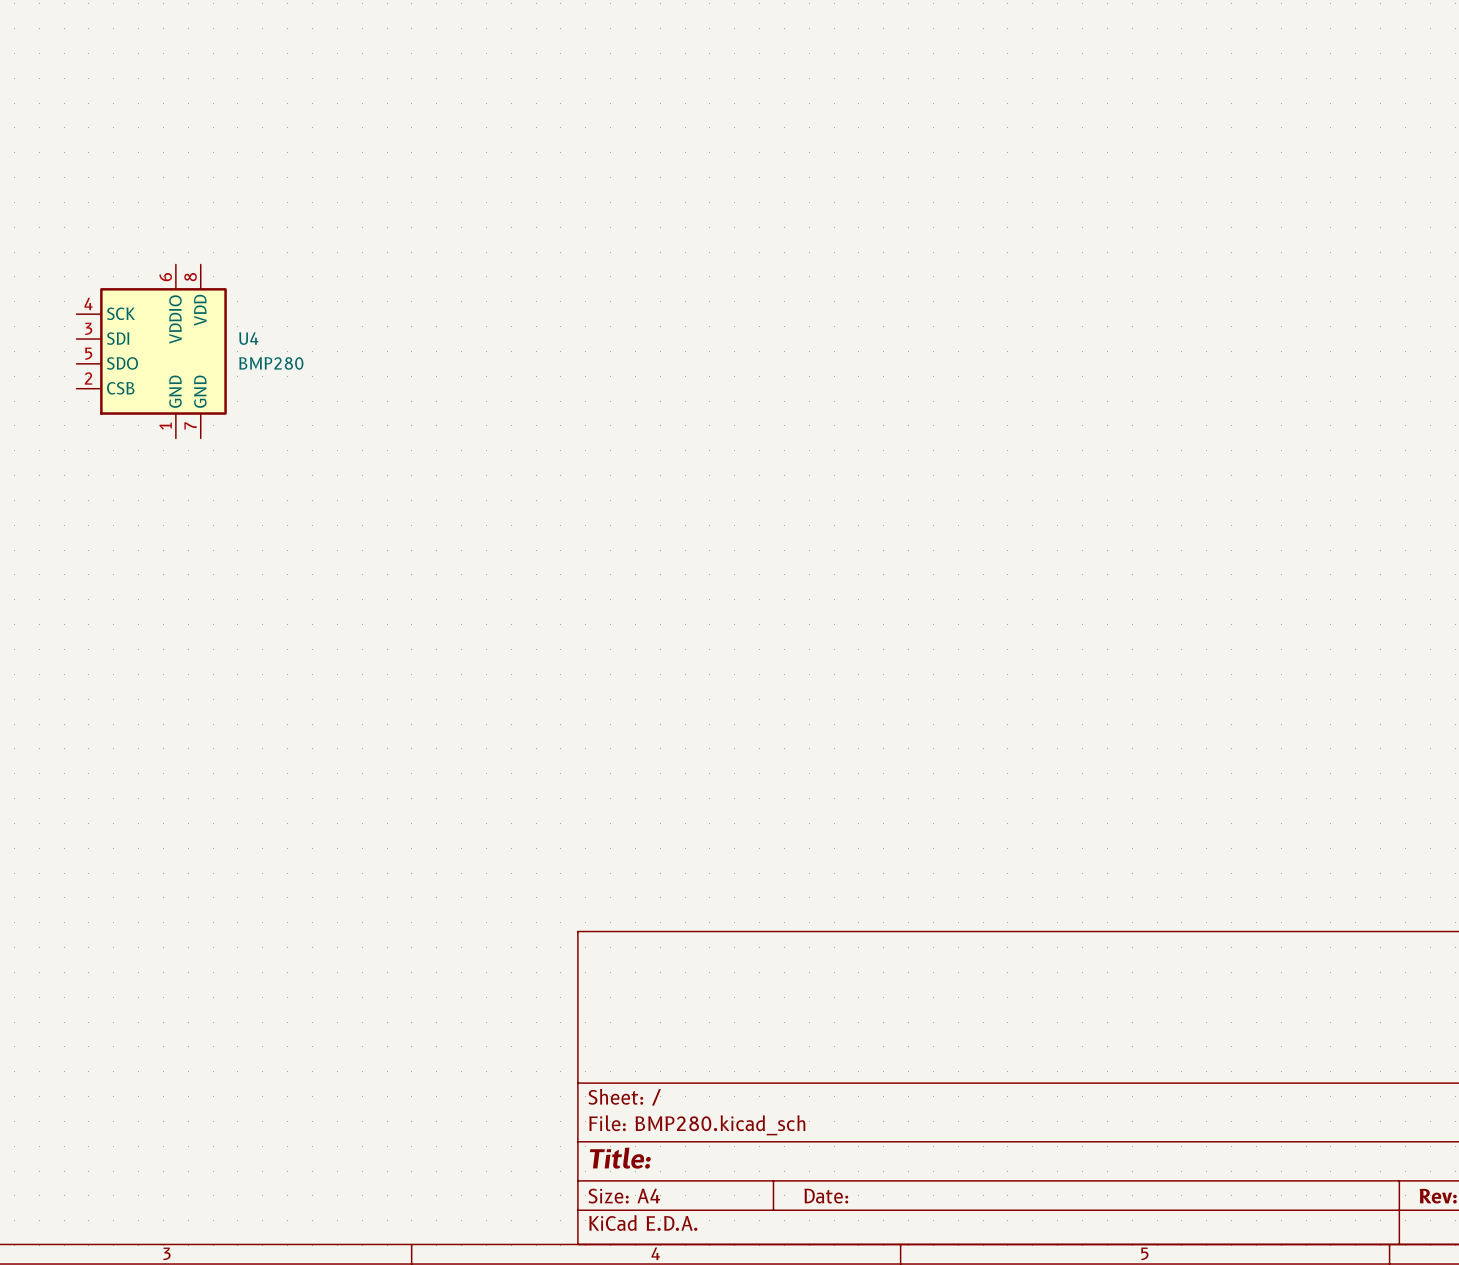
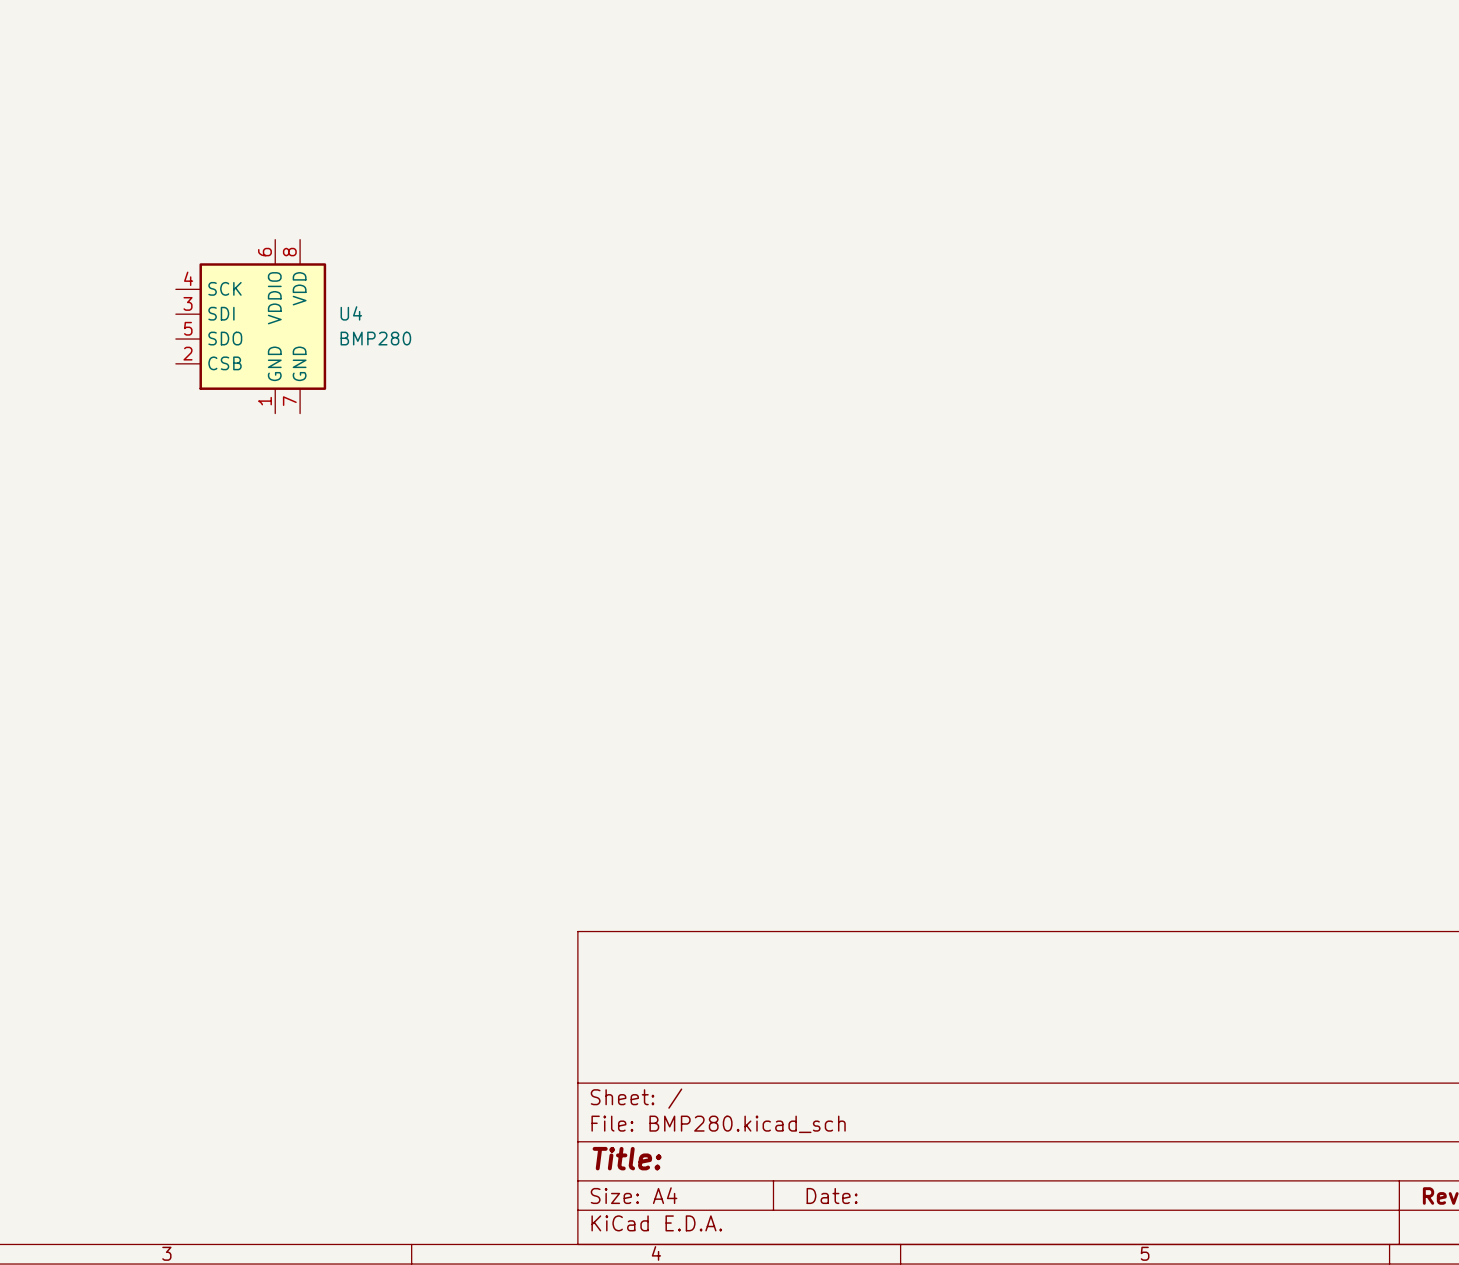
U4 position: (151, 351) -> (251, 326)

